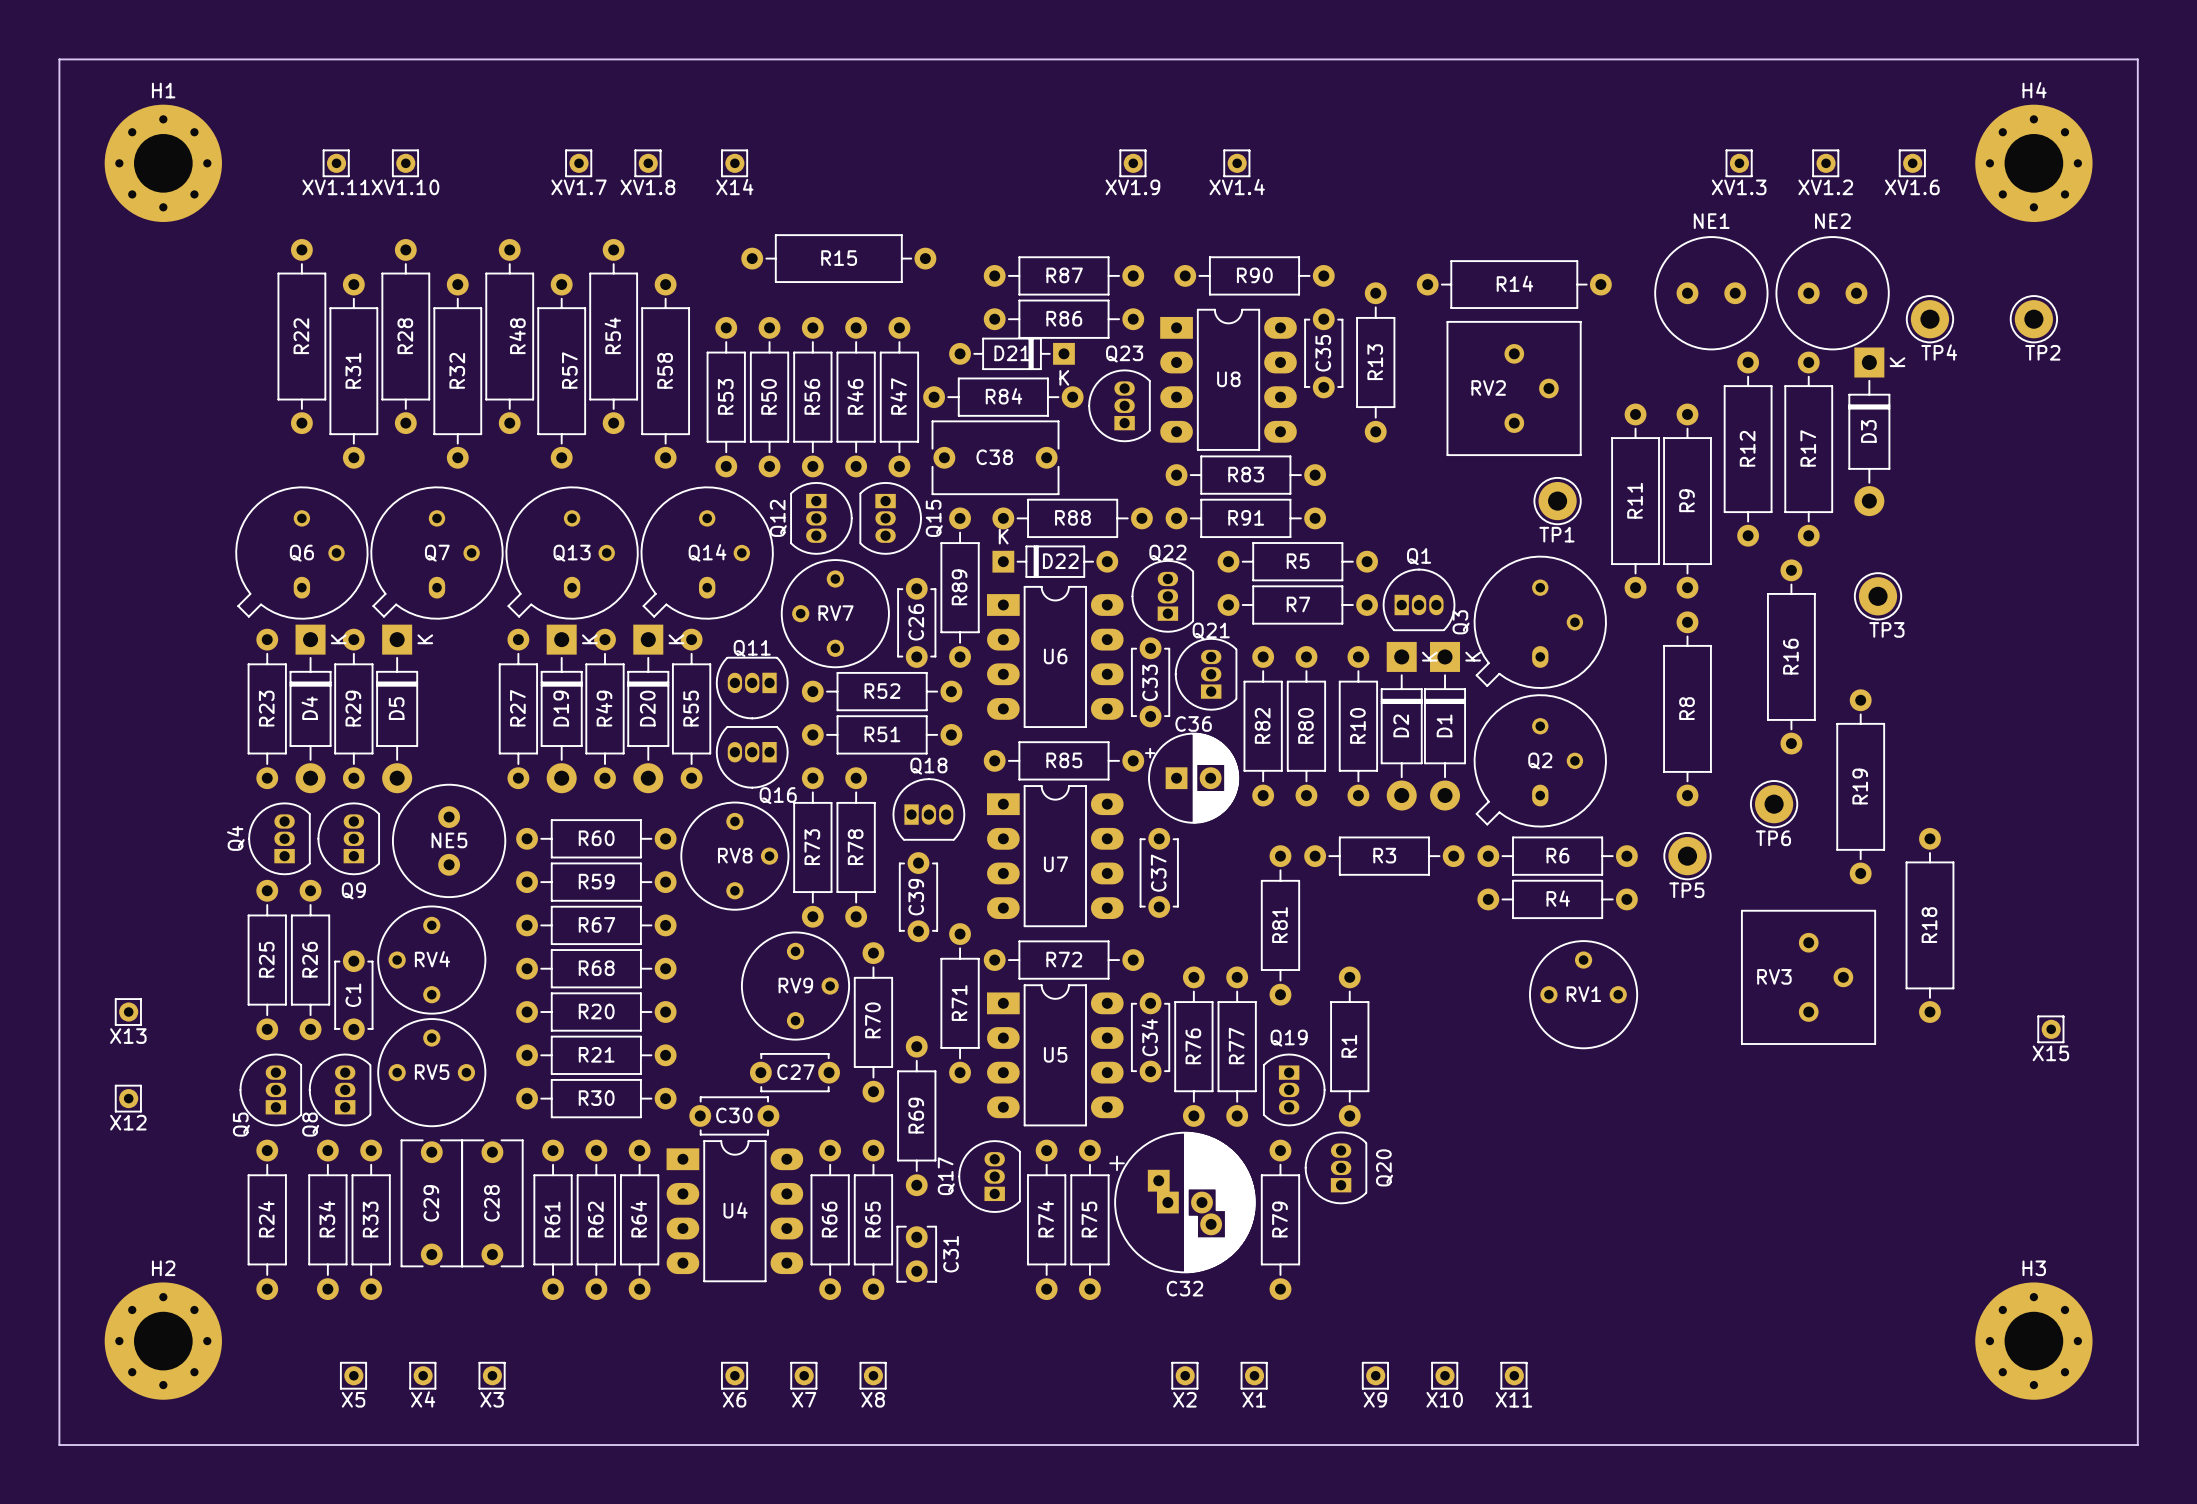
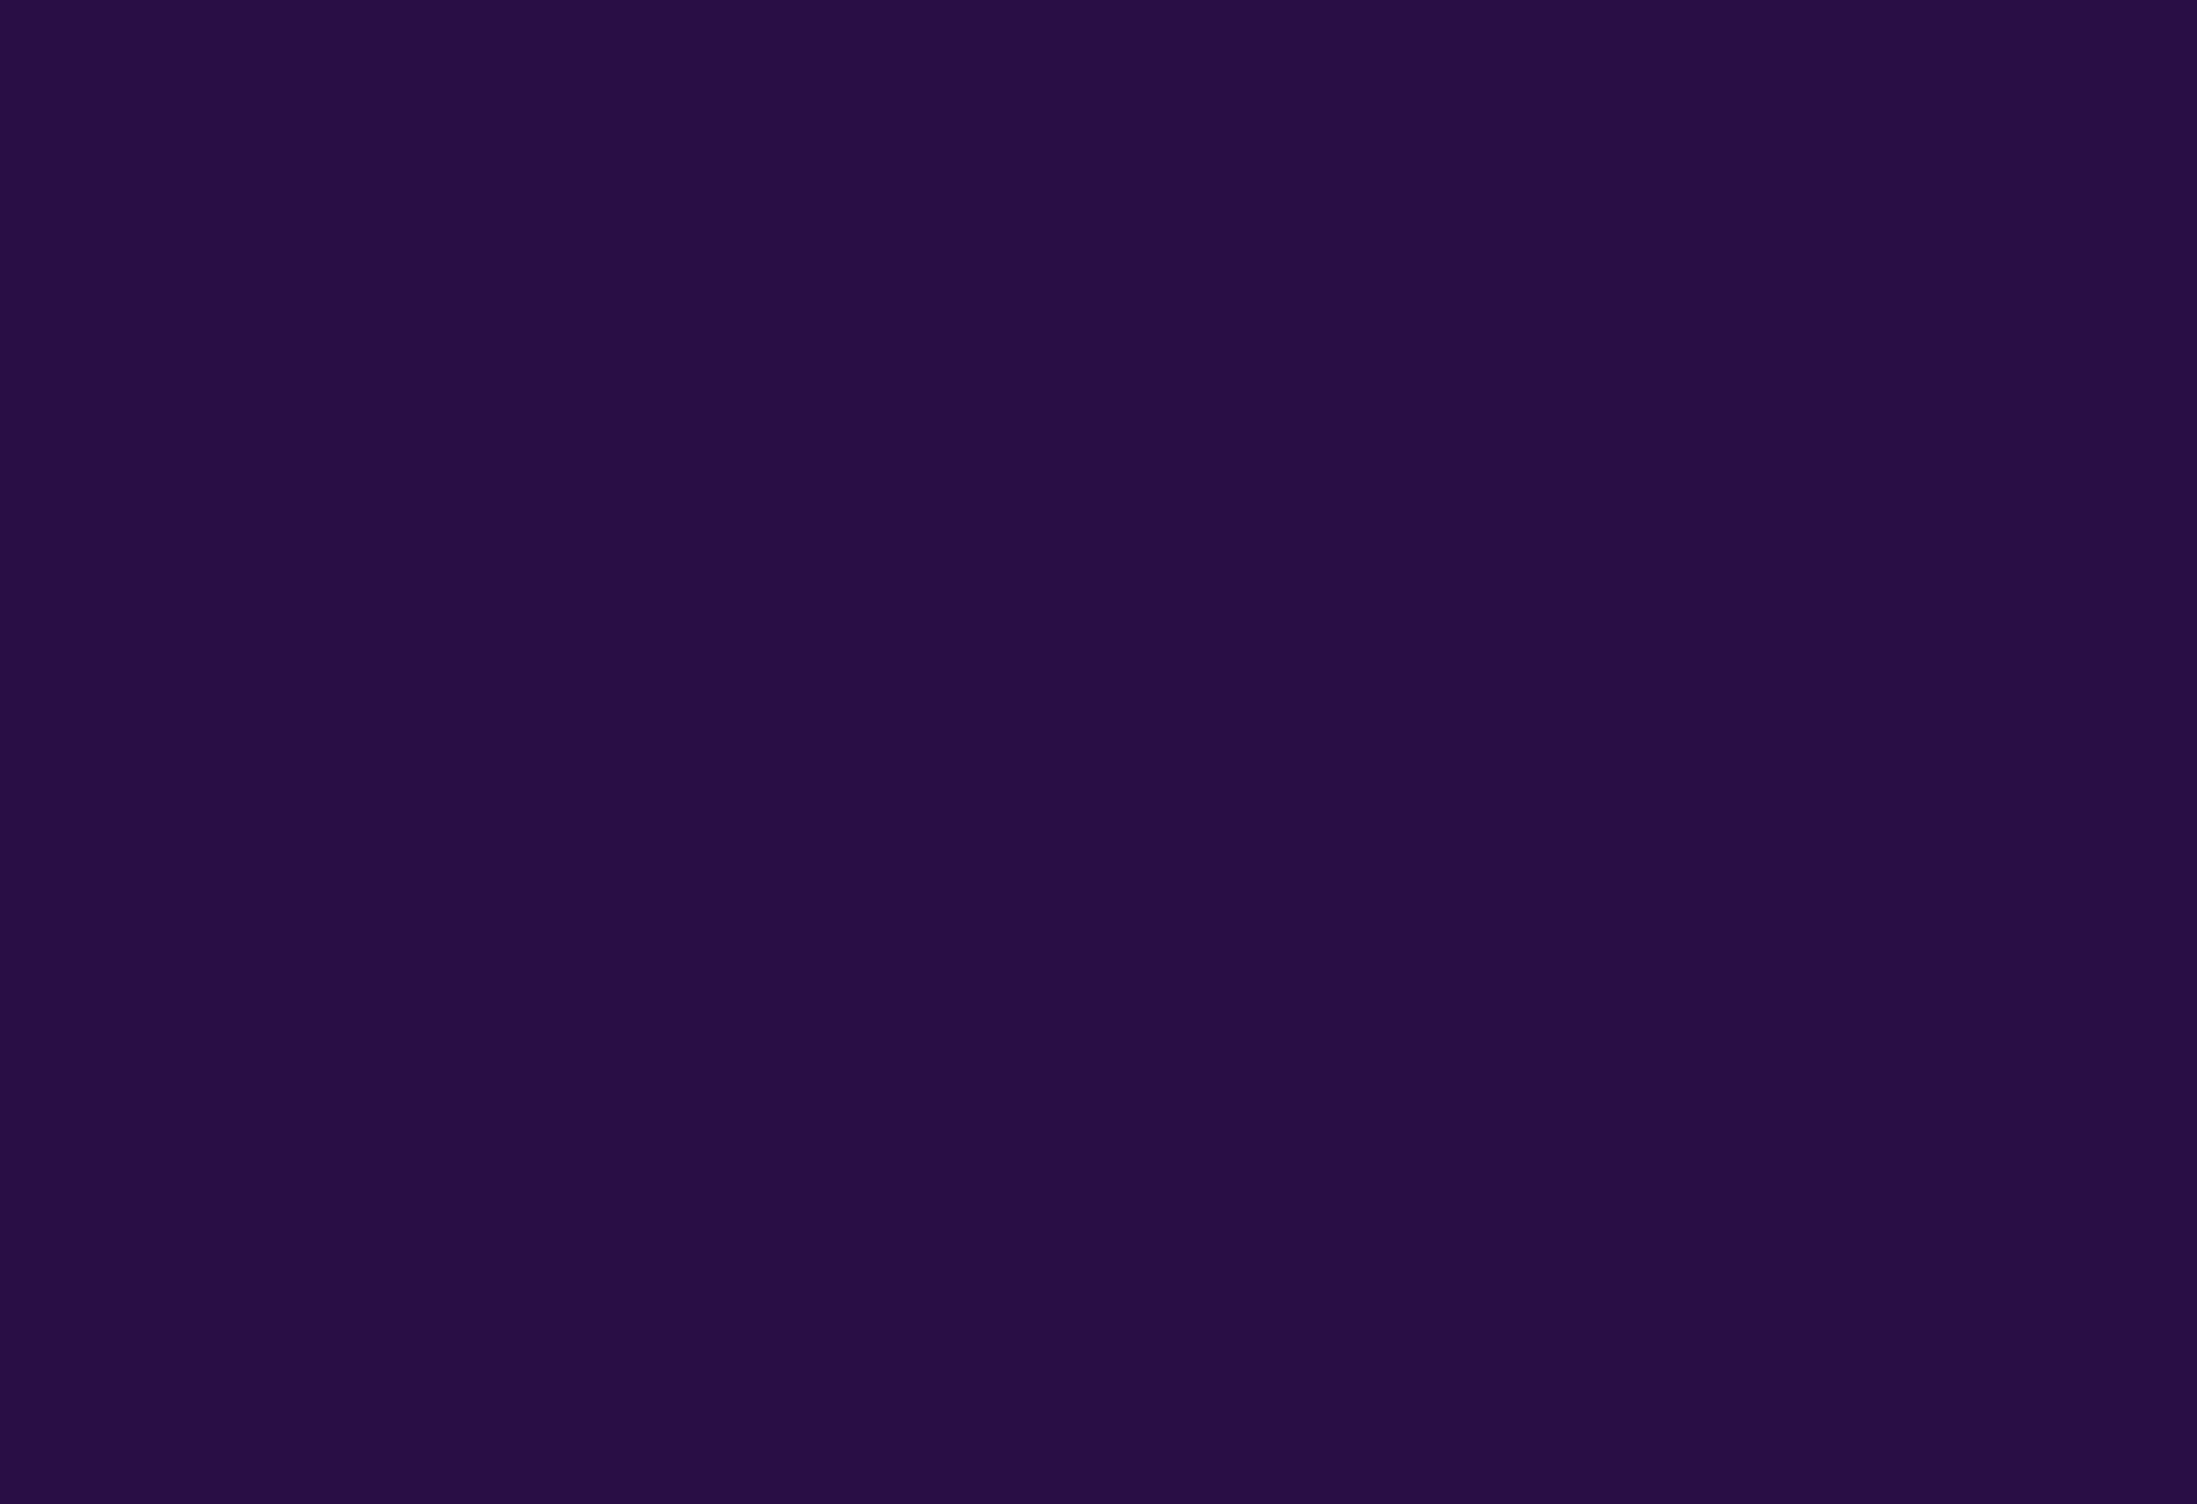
board edge: (59, 59) (59, 1445) (2137, 1445) (2137, 59) (59, 59) -> none
H1: (163, 163) -> none
XV1.11: (336, 163) -> none
XV1.10: (405, 163) -> none
XV1.7: (578, 163) -> none
XV1.8: (647, 163) -> none
X14: (734, 163) -> none
XV1.9: (1132, 163) -> none
XV1.4: (1236, 163) -> none
XV1.3: (1739, 163) -> none
XV1.2: (1825, 163) -> none
XV1.6: (1912, 163) -> none
H4: (2033, 163) -> none
R15: (838, 258) -> none
R87: (1063, 275) -> none
R90: (1254, 275) -> none
R14: (1514, 284) -> none
NE1: (1711, 293) -> none
NE2: (1832, 293) -> none
R86: (1063, 319) -> none
TP4: (1929, 319) -> none
TP2: (2033, 319) -> none
R22: (301, 336) -> none
R28: (405, 336) -> none
R48: (509, 336) -> none
R54: (613, 336) -> none
D21: (1012, 353) -> none
C35: (1323, 353) -> none
R13: (1375, 362) -> none
R31: (353, 371) -> none
R32: (457, 371) -> none
R57: (561, 371) -> none
R58: (665, 371) -> none
U8: (1228, 379) -> none
RV2: (1514, 388) -> none
R53: (726, 397) -> none
R50: (769, 397) -> none
R56: (812, 397) -> none
R46: (856, 397) -> none
R47: (899, 397) -> none
R84: (1003, 397) -> none
Q23: (1119, 405) -> none
D3: (1869, 431) -> none
R12: (1748, 449) -> none
R17: (1808, 449) -> none
C38: (995, 457) -> none
R83: (1245, 475) -> none
TP1: (1557, 501) -> none
R11: (1635, 501) -> none
R9: (1687, 501) -> none
Q12: (821, 518) -> none
Q15: (890, 518) -> none
R88: (1072, 518) -> none
R91: (1245, 518) -> none
Q6: (301, 553) -> none
Q7: (436, 553) -> none
Q13: (572, 553) -> none
Q14: (707, 553) -> none
D22: (1055, 561) -> none
R5: (1297, 561) -> none
R89: (960, 587) -> none
Q22: (1162, 596) -> none
TP3: (1878, 596) -> none
Q1: (1419, 599) -> none
R7: (1297, 604) -> none
RV7: (835, 613) -> none
C26: (916, 622) -> none
Q3: (1540, 622) -> none
U6: (1055, 656) -> none
R16: (1791, 656) -> none
Q21: (1206, 674) -> none
C33: (1150, 682) -> none
Q11: (752, 688) -> none
R52: (882, 691) -> none
R23: (267, 708) -> none
D4: (310, 708) -> none
R29: (353, 708) -> none
D5: (397, 708) -> none
R27: (518, 708) -> none
D19: (561, 708) -> none
R49: (604, 708) -> none
D20: (648, 708) -> none
R55: (691, 708) -> none
R8: (1687, 708) -> none
R82: (1263, 726) -> none
R80: (1306, 726) -> none
R10: (1358, 726) -> none
D2: (1401, 726) -> none
D1: (1445, 726) -> none
R51: (882, 734) -> none
Q16: (752, 757) -> none
R85: (1063, 760) -> none
Q2: (1540, 760) -> none
C36: (1192, 778) -> none
R19: (1860, 786) -> none
TP6: (1774, 804) -> none
Q18: (928, 809) -> none
Q4: (279, 838) -> none
Q9: (348, 838) -> none
R60: (596, 838) -> none
NE5: (449, 840) -> none
R73: (812, 847) -> none
R78: (856, 847) -> none
RV8: (734, 856) -> none
U7: (1055, 856) -> none
R3: (1384, 856) -> none
R6: (1557, 856) -> none
TP5: (1687, 856) -> none
C37: (1159, 872) -> none
R59: (596, 882) -> none
C39: (918, 897) -> none
R4: (1557, 899) -> none
R67: (596, 925) -> none
R81: (1280, 925) -> none
R18: (1929, 925) -> none
R25: (267, 960) -> none
R26: (310, 960) -> none
RV4: (431, 960) -> none
R72: (1063, 960) -> none
R68: (596, 968) -> none
RV3: (1808, 977) -> none
RV9: (795, 986) -> none
RV1: (1583, 994) -> none
C1: (353, 995) -> none
R71: (960, 1003) -> none
X13: (128, 1012) -> none
R20: (596, 1012) -> none
R70: (873, 1022) -> none
X15: (2050, 1029) -> none
C34: (1150, 1037) -> none
R76: (1193, 1046) -> none
R77: (1237, 1046) -> none
R1: (1349, 1046) -> none
R21: (596, 1055) -> none
U5: (1055, 1055) -> none
RV5: (431, 1072) -> none
C27: (794, 1072) -> none
Q5: (270, 1089) -> none
Q8: (340, 1089) -> none
Q19: (1294, 1089) -> none
X12: (128, 1098) -> none
R30: (596, 1098) -> none
C30: (734, 1115) -> none
R69: (916, 1115) -> none
Q20: (1335, 1167) -> none
Q17: (989, 1176) -> none
C32: (1182, 1202) -> none
C29: (431, 1203) -> none
C28: (492, 1203) -> none
U4: (734, 1211) -> none
R24: (267, 1219) -> none
R34: (327, 1219) -> none
R33: (371, 1219) -> none
R61: (553, 1219) -> none
R62: (596, 1219) -> none
R64: (639, 1219) -> none
R66: (830, 1219) -> none
R65: (873, 1219) -> none
R74: (1046, 1219) -> none
R75: (1089, 1219) -> none
R79: (1280, 1219) -> none
C31: (916, 1254) -> none
H2: (163, 1341) -> none
H3: (2033, 1341) -> none
X5: (353, 1375) -> none
X4: (422, 1375) -> none
X3: (492, 1375) -> none
X6: (734, 1375) -> none
X7: (803, 1375) -> none
X8: (873, 1375) -> none
X2: (1184, 1375) -> none
X1: (1254, 1375) -> none
X9: (1375, 1375) -> none
X10: (1444, 1375) -> none
X11: (1513, 1375) -> none

